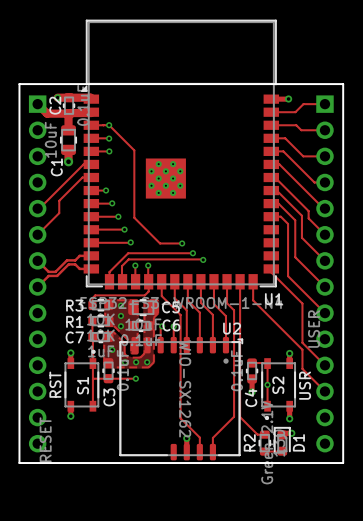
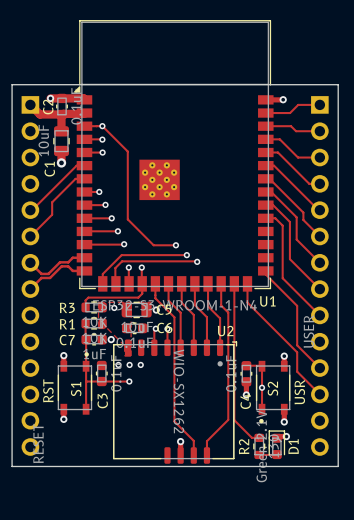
zone outline: (144, 300) (144, 353) (140, 357) (128, 357) (124, 354) (124, 343) (113, 332) (104, 332) (104, 367) (148, 367) (153, 362) (153, 317) (158, 313) (158, 300) -> none
via: none -> (156, 310)
via: (120, 315) -> none
via: (120, 326) -> none
via: none -> (111, 339)
via: (112, 349) -> none

